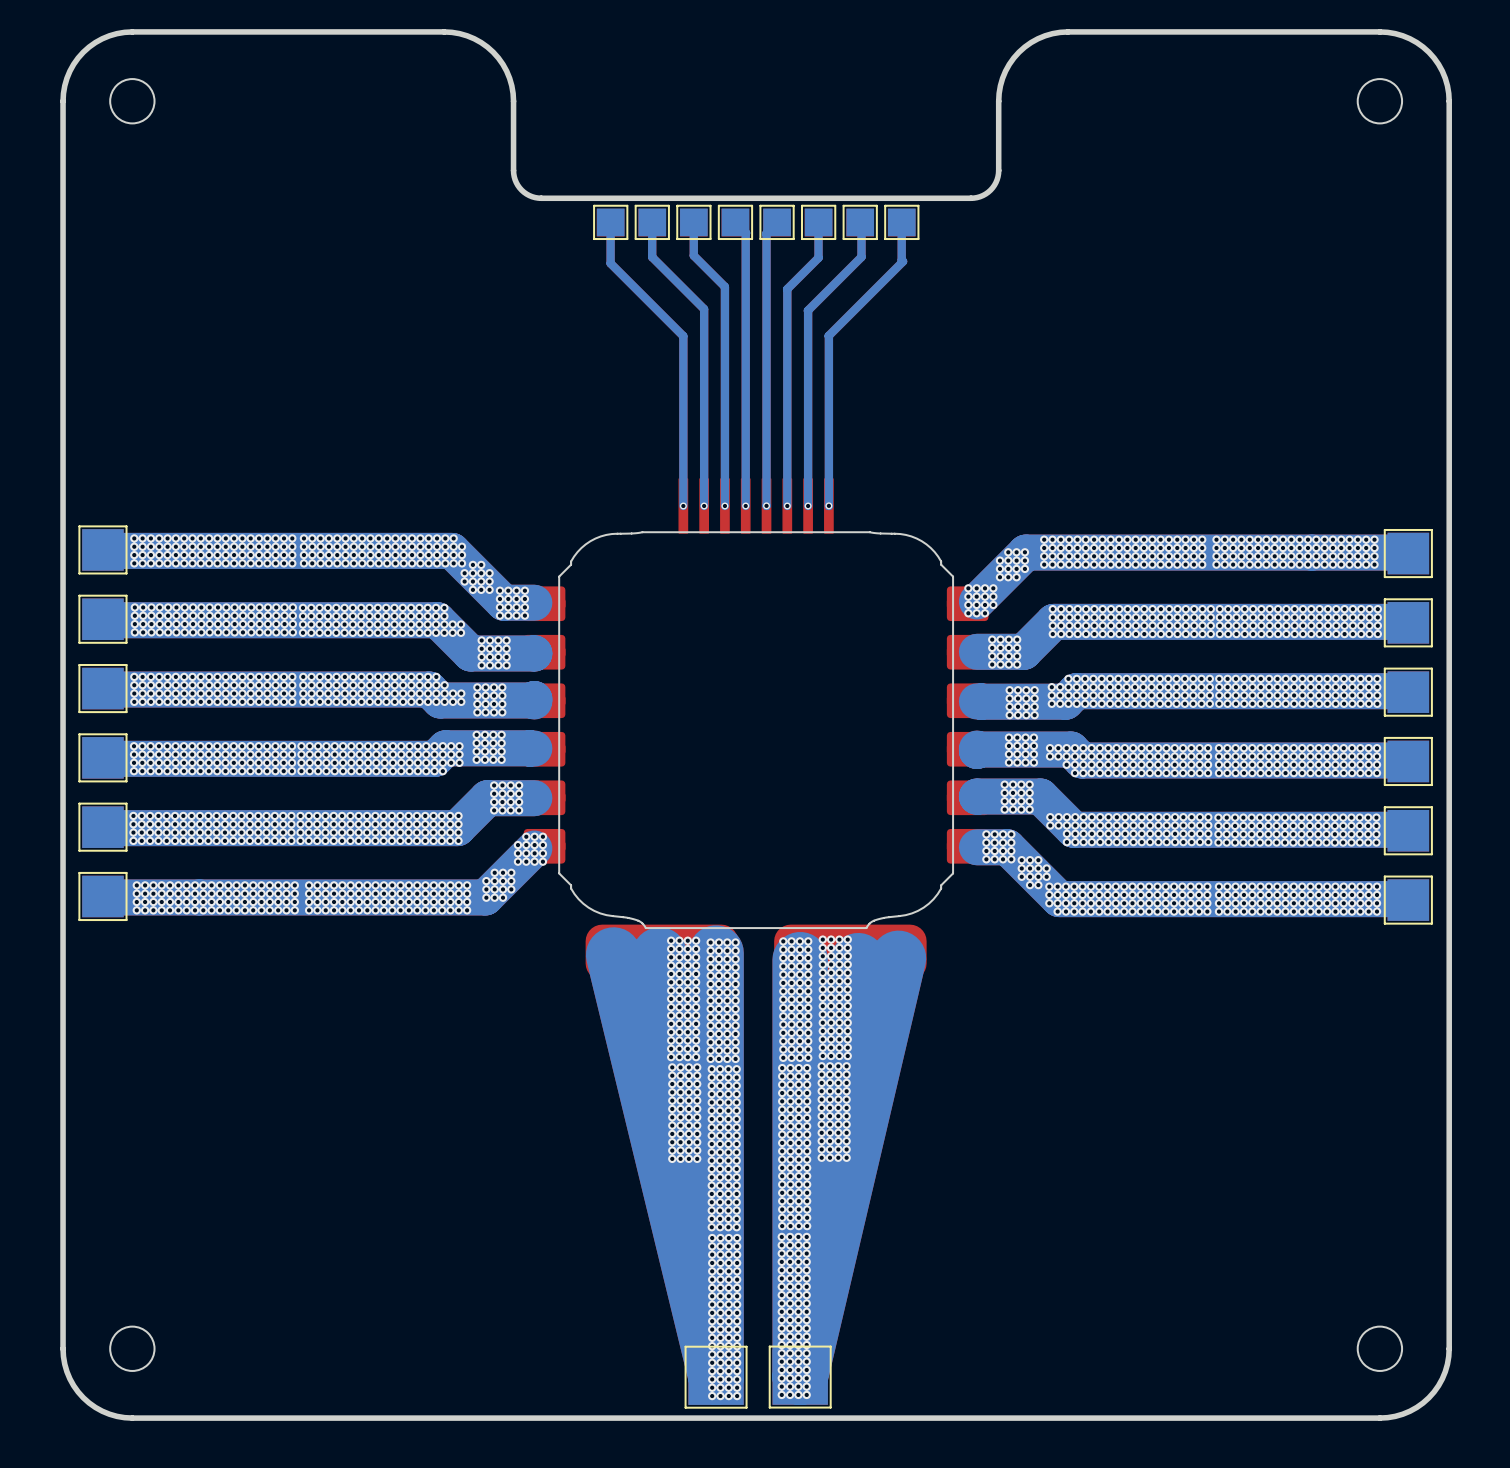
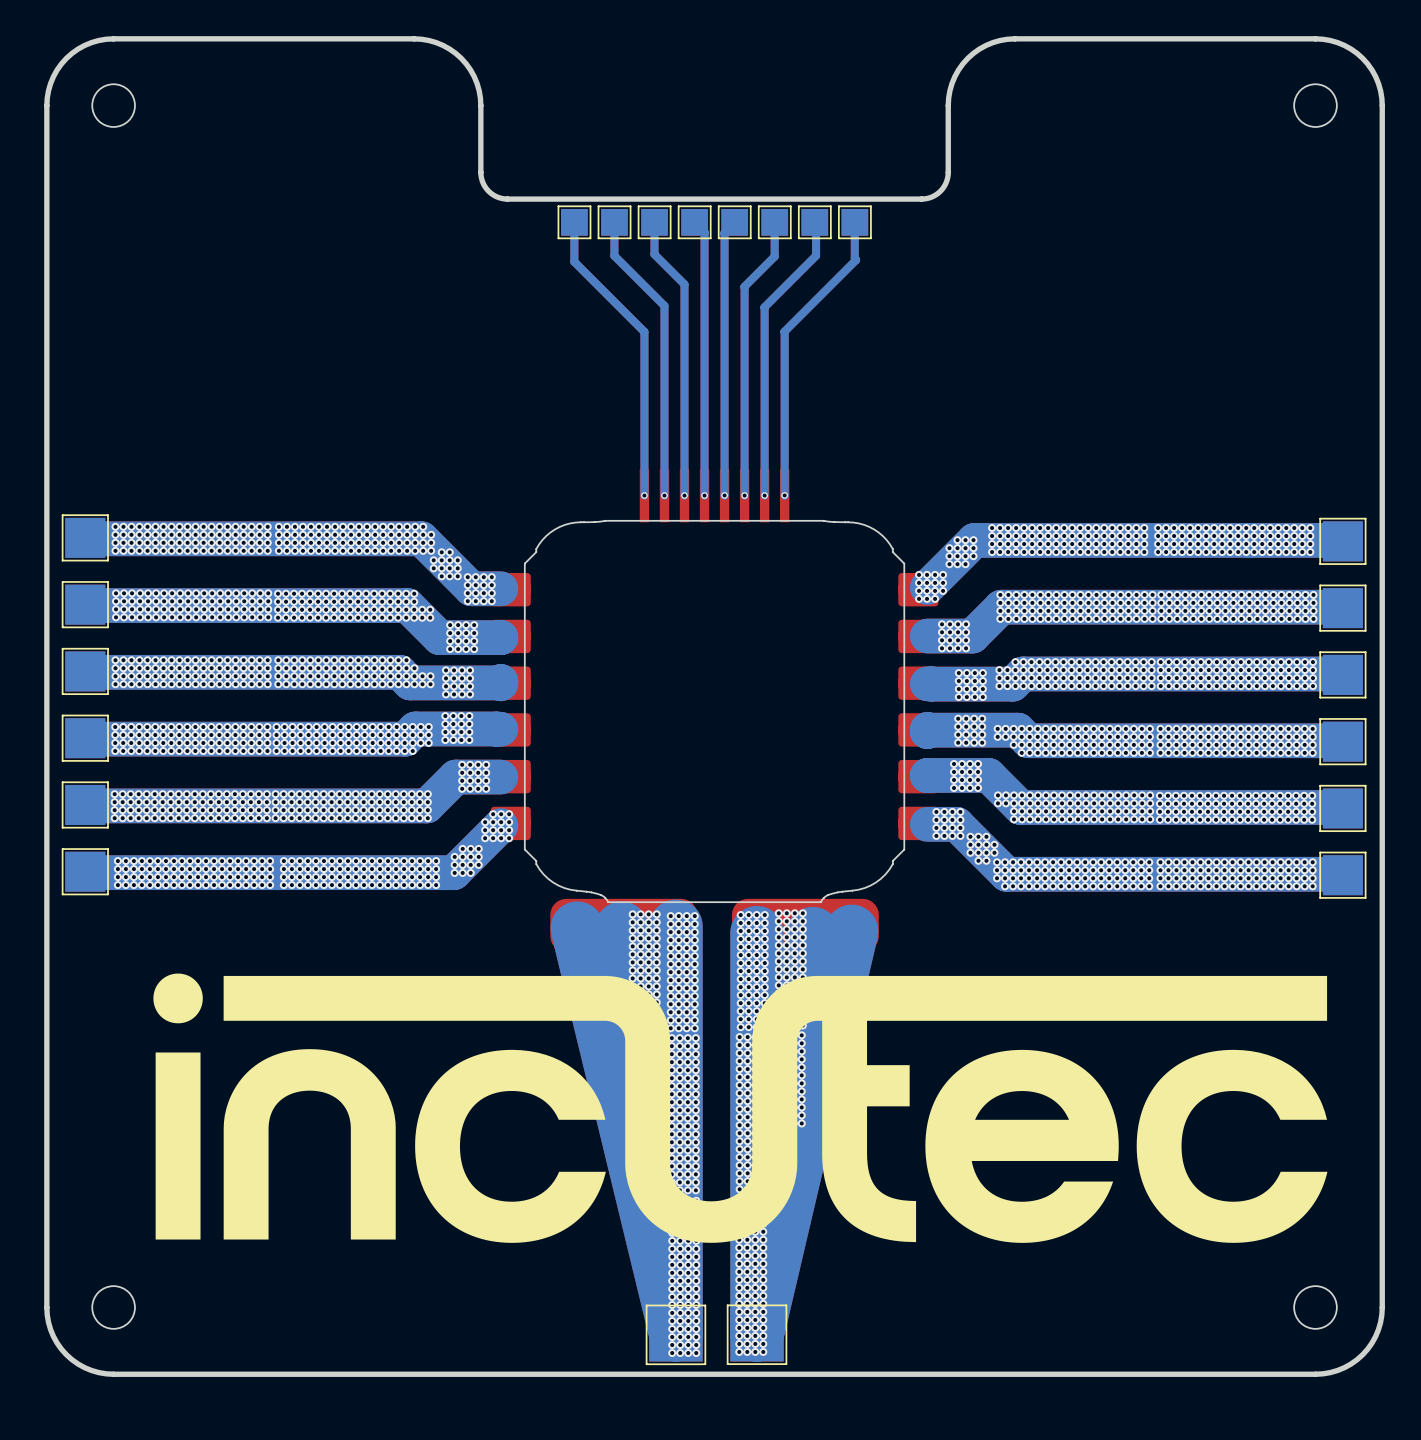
drawing: none -> [153, 973, 203, 1024]
drawing: none -> [223, 975, 1328, 1243]
drawing: none -> [155, 1052, 201, 1240]

